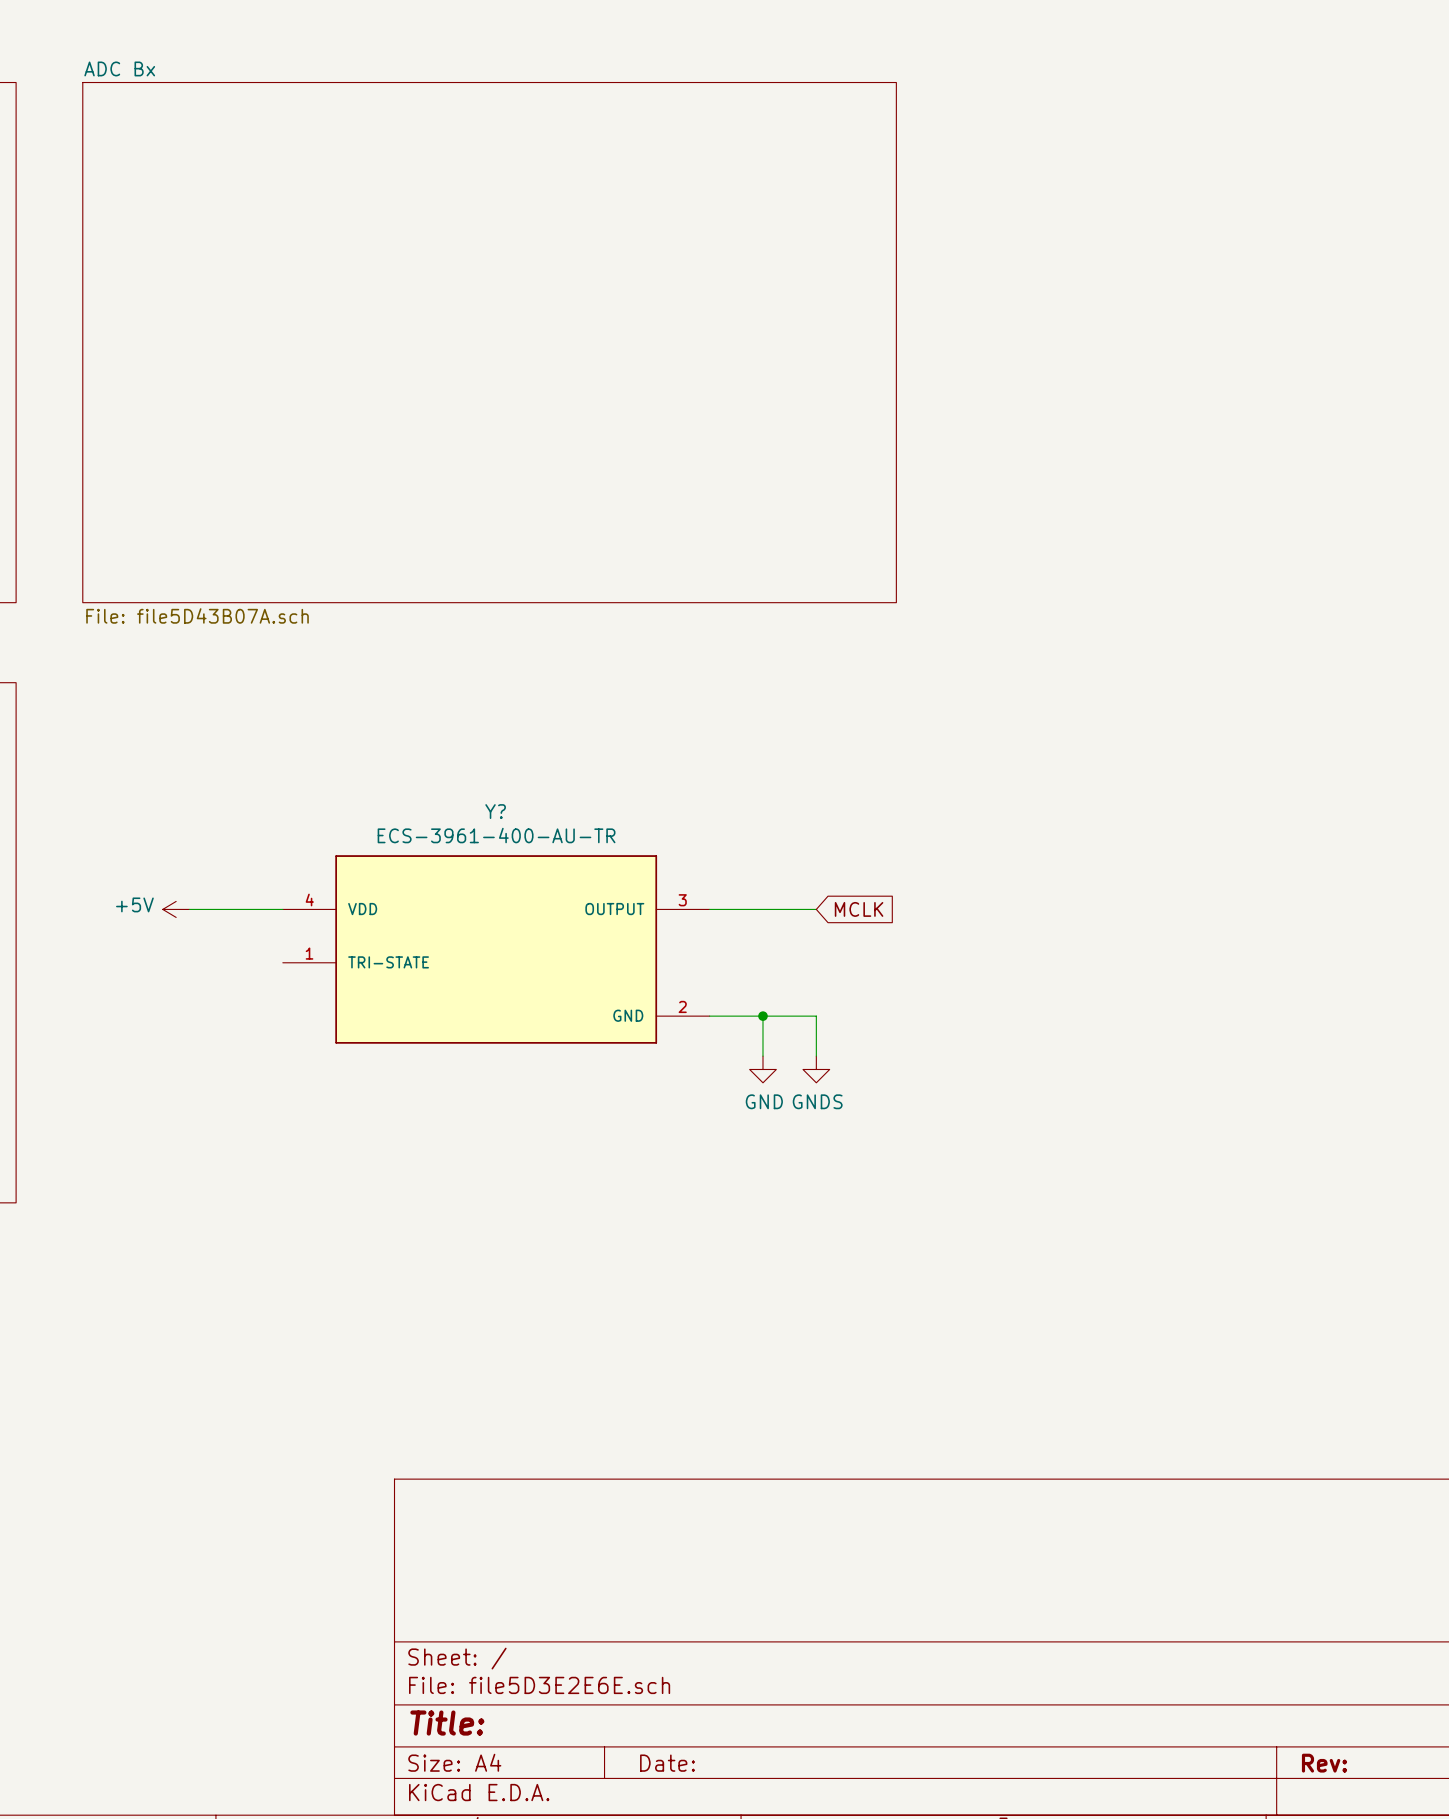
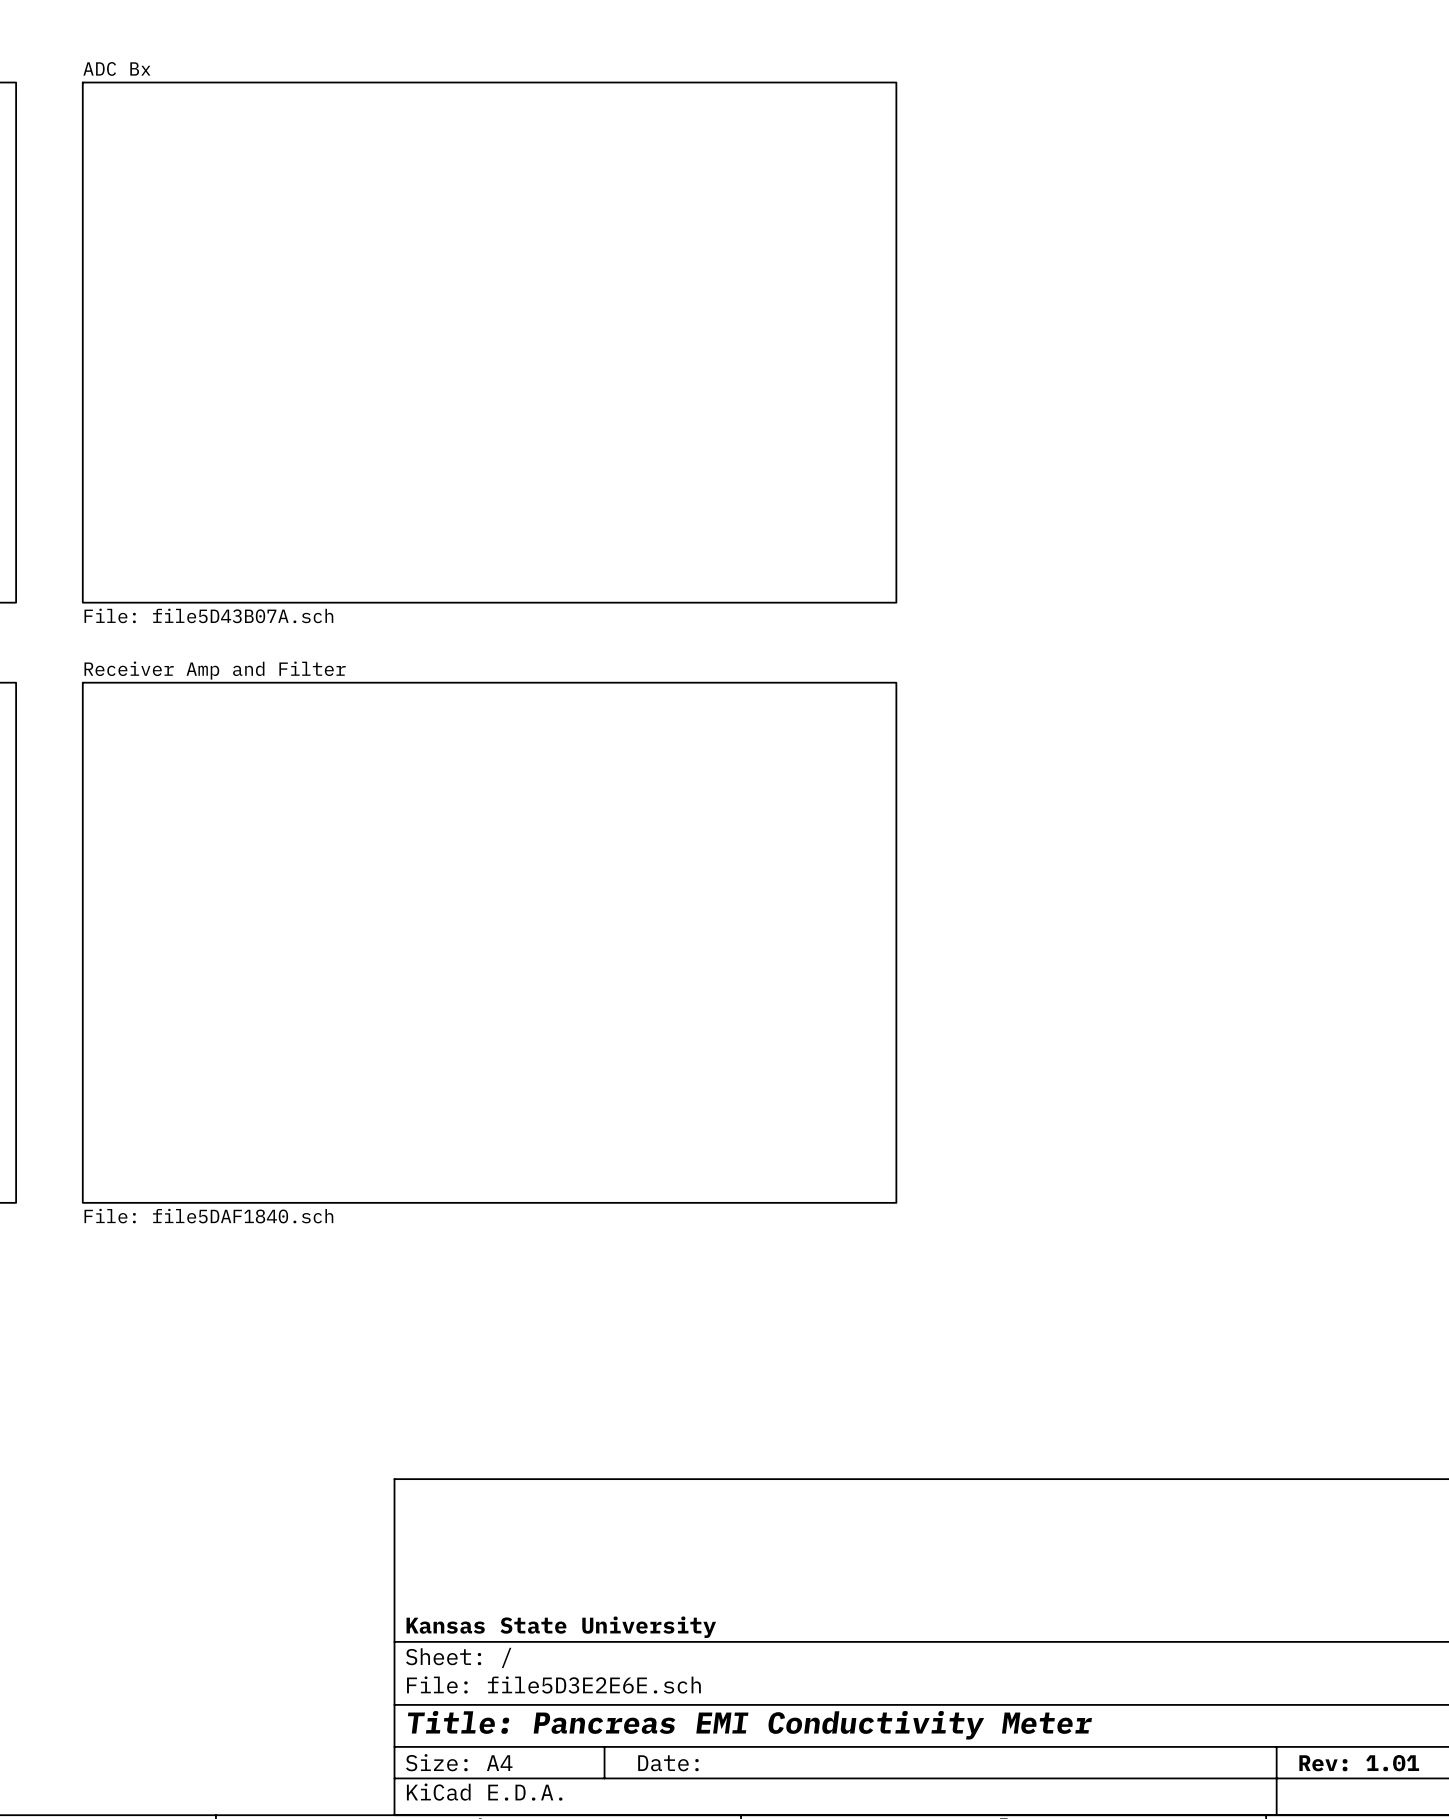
power symbol: +5V (176, 909) -> none
wire: (189, 909) (282, 909) -> none
wire: (709, 909) (816, 909) -> none
global label: MCLK (859, 909) -> none
sheet Receiver Amp and Filter: none -> File: file5DAF1840.sch (489, 942)
Y?: ECS-3961-400-AU-TR (496, 949) -> none
wire: (709, 1016) (816, 1016) (816, 1056) -> none
wire: (762, 1016) (762, 1056) -> none
junction: (762, 1016) -> none
power symbol: GND (762, 1069) -> none
power symbol: GNDS (816, 1069) -> none
title block: none -> Kansas State University (561, 1627)
title block: Title: (447, 1723) -> Title: Pancreas EMI Conductivity Meter (749, 1725)
title block: Rev: (1324, 1763) -> Rev: 1.01 (1359, 1763)

